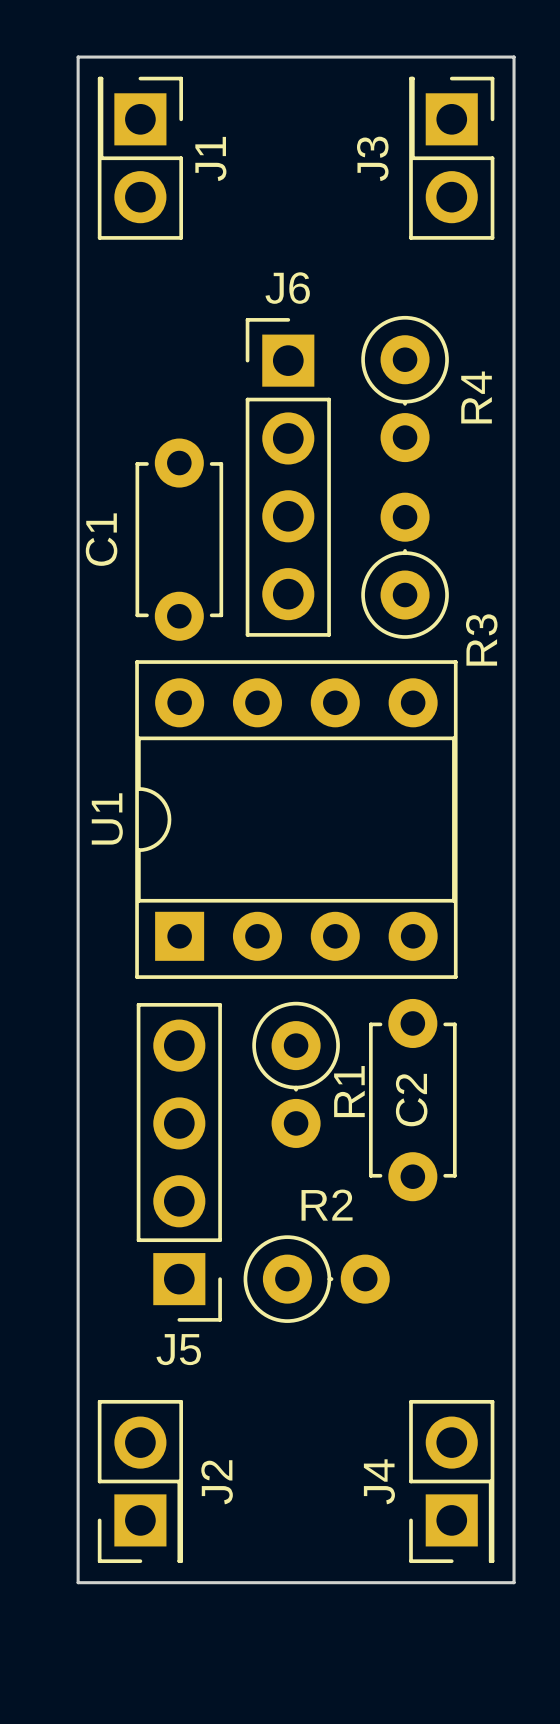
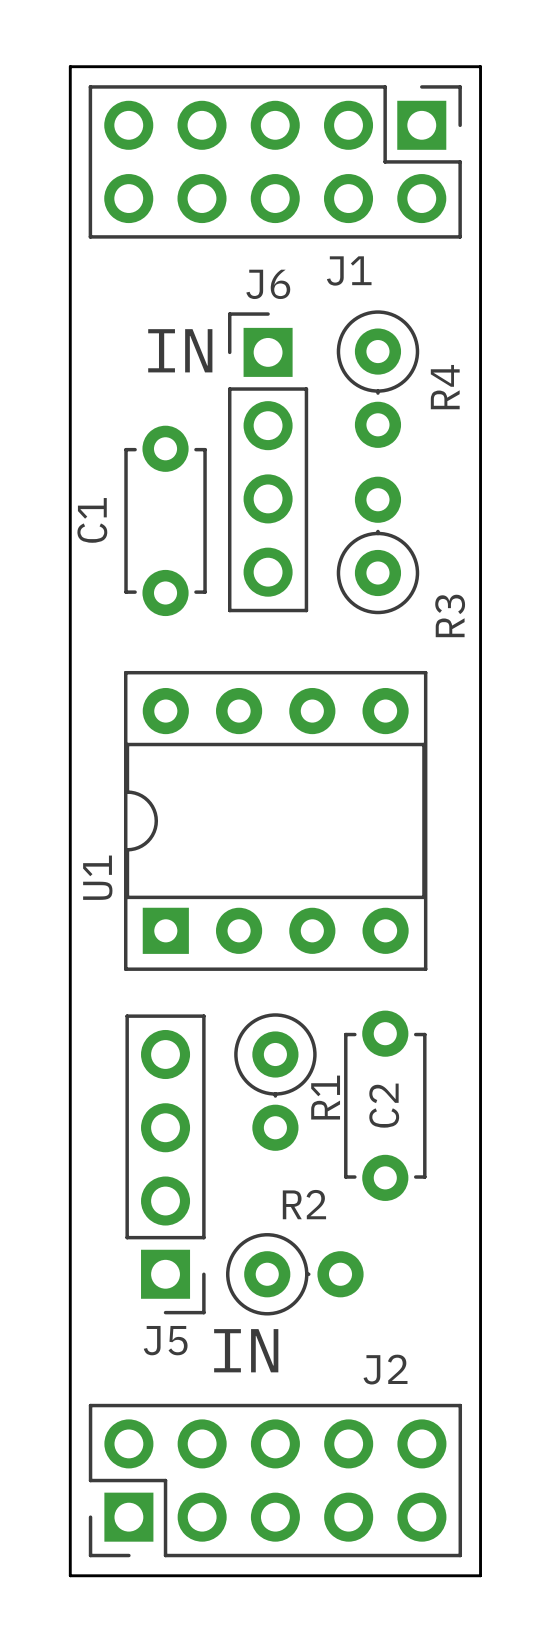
J1 footprint: [97, 76, 184, 240] -> [88, 85, 462, 239]
J1 name position: J1 (210, 158) -> J1 (349, 270)
J3: (451, 158) -> none
text: none -> IN (180, 350)
U1 name position: U1 (107, 818) -> U1 (97, 877)
U1 position: (296, 819) -> (275, 820)
R1 position: (296, 1074) -> (275, 1082)
C2 position: (412, 1100) -> (385, 1105)
J5 position: (179, 1162) -> (165, 1164)
R2 position: (316, 1279) -> (294, 1274)
J2 footprint: [97, 1399, 184, 1564] -> [88, 1403, 463, 1558]
text: none -> IN (246, 1350)
J4: (451, 1481) -> none
J2 name position: J2 (217, 1482) -> J2 (385, 1369)
board edge: (78, 1582) (514, 1582) -> (70, 1502) (70, 1575) (480, 1575) (480, 1502)

